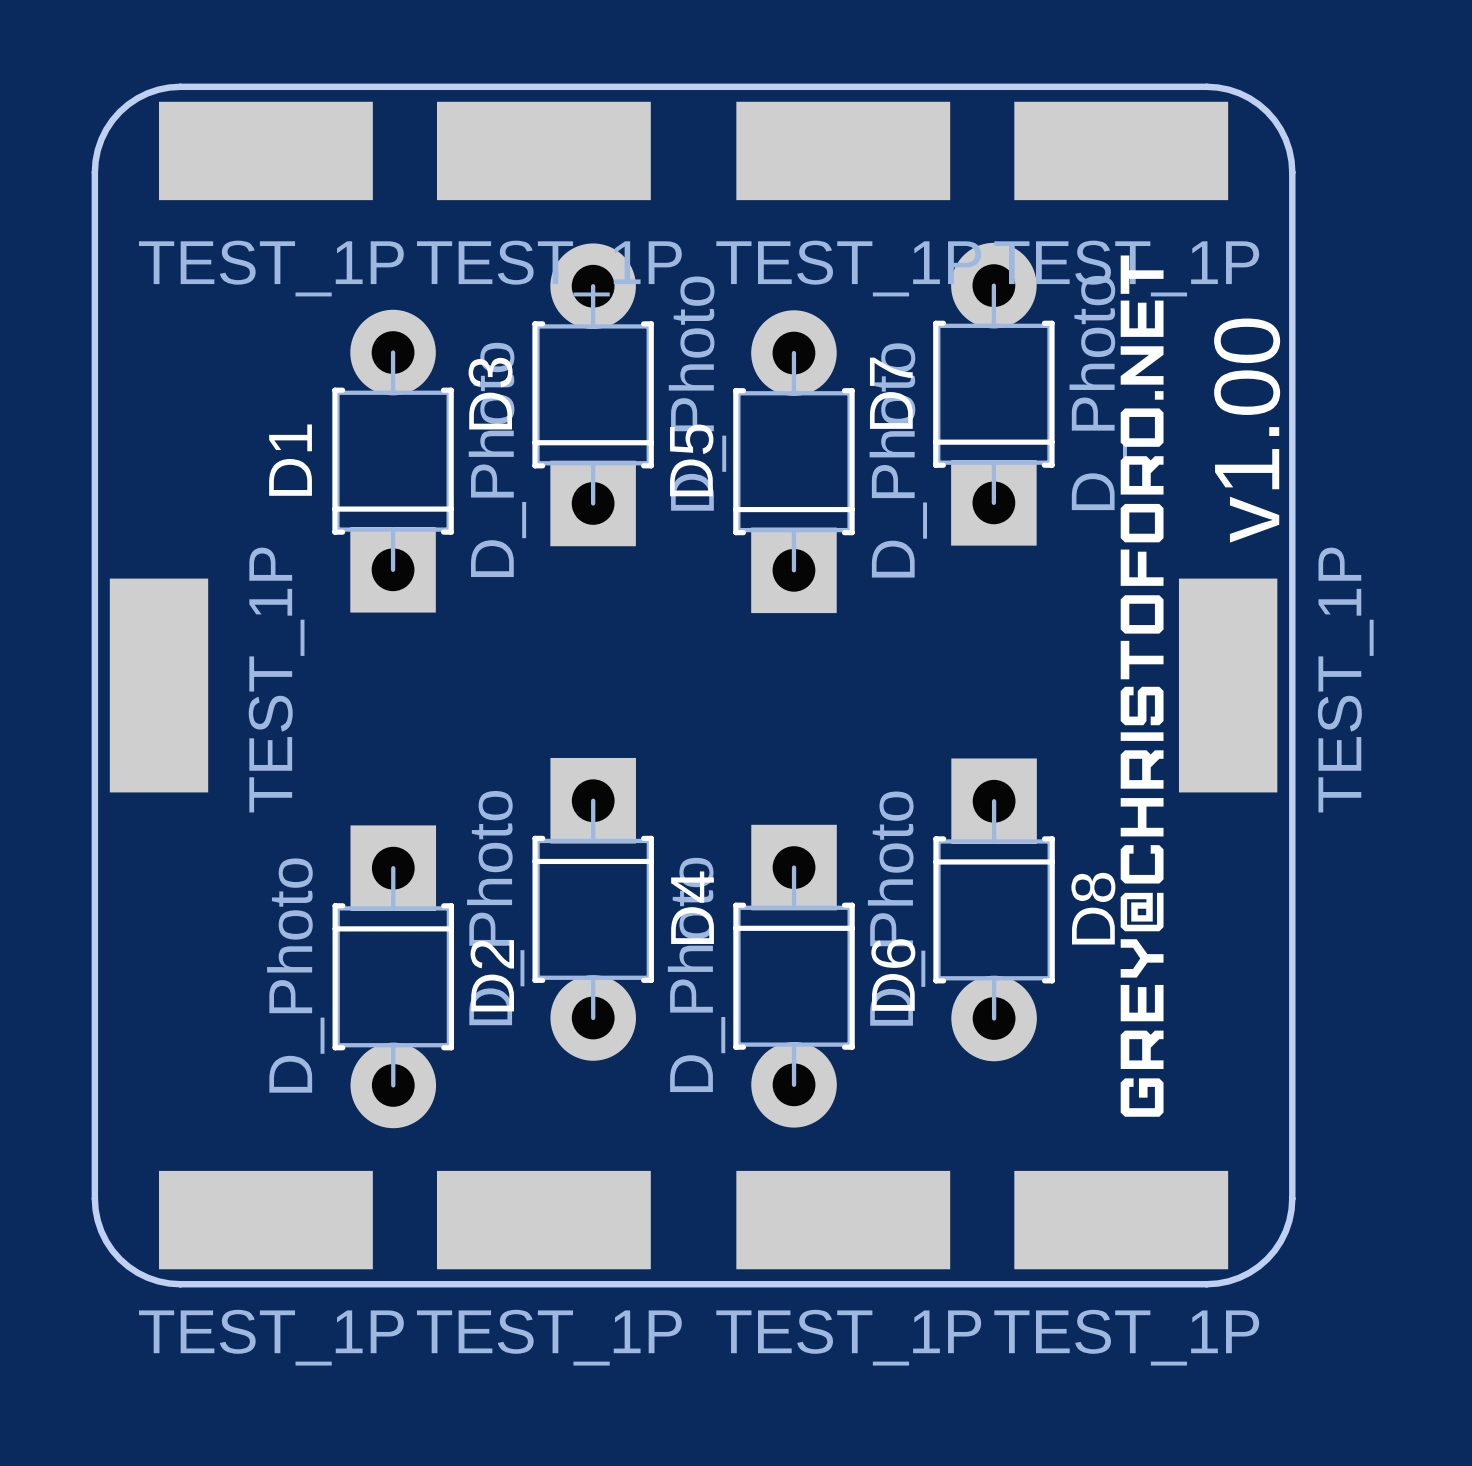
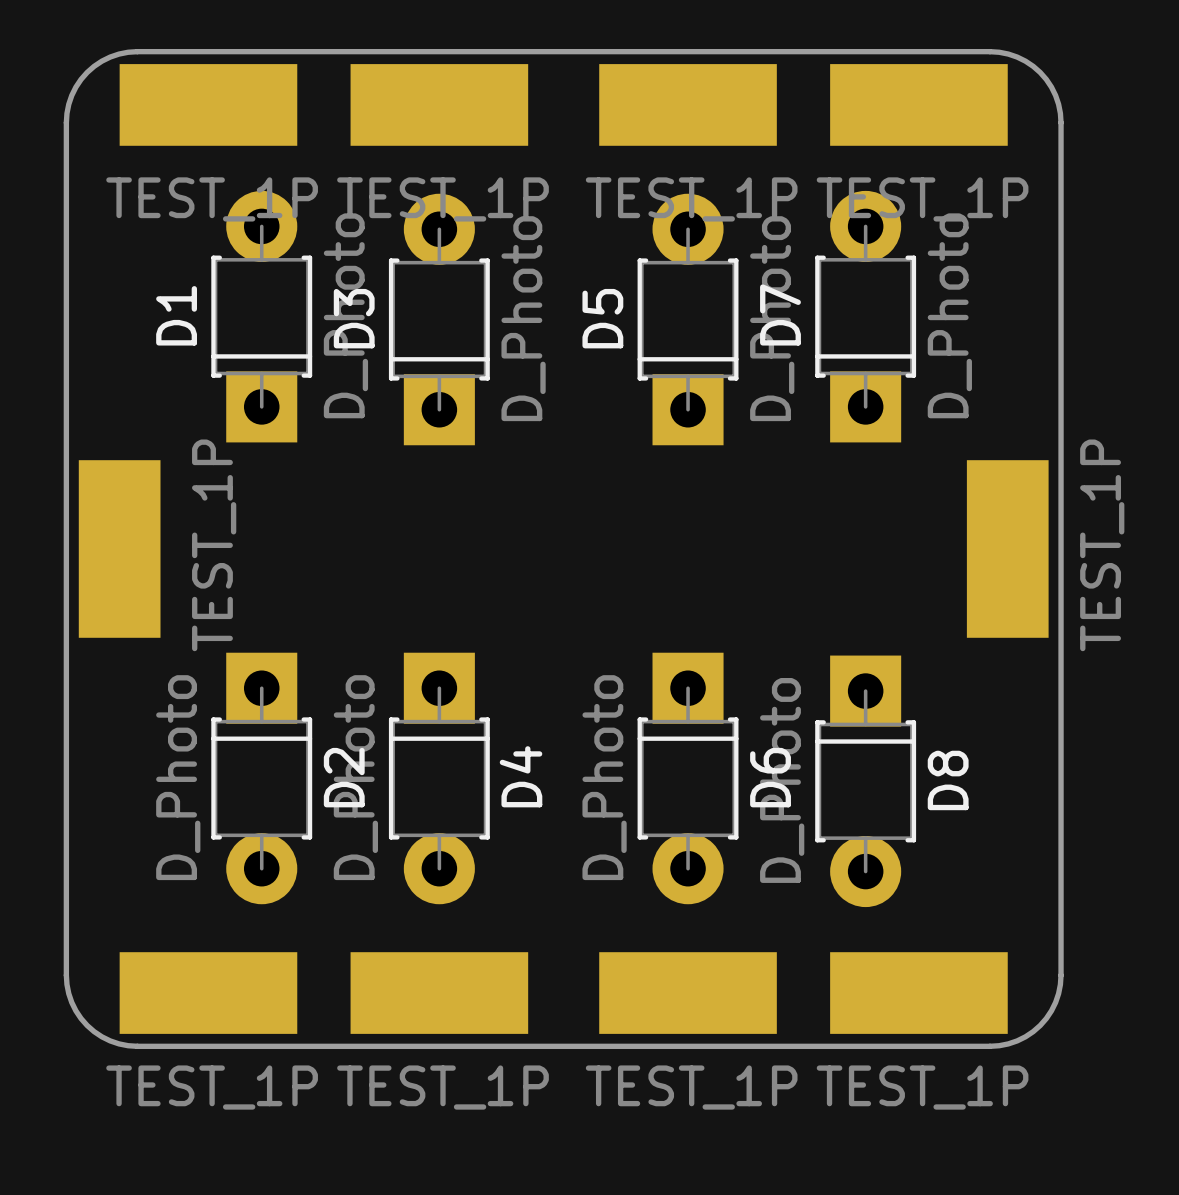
drawing: [1120, 255, 1164, 1117] -> none
D3 position: (593, 394) -> (439, 319)
D7 position: (993, 394) -> (865, 316)
text: v1.00 (1247, 430) -> none
D1 position: (393, 461) -> (261, 316)
D5 position: (793, 461) -> (688, 319)
D4 position: (593, 909) -> (439, 778)
D8 position: (994, 909) -> (865, 781)
D2 position: (393, 976) -> (261, 778)
D6 position: (794, 976) -> (688, 778)

